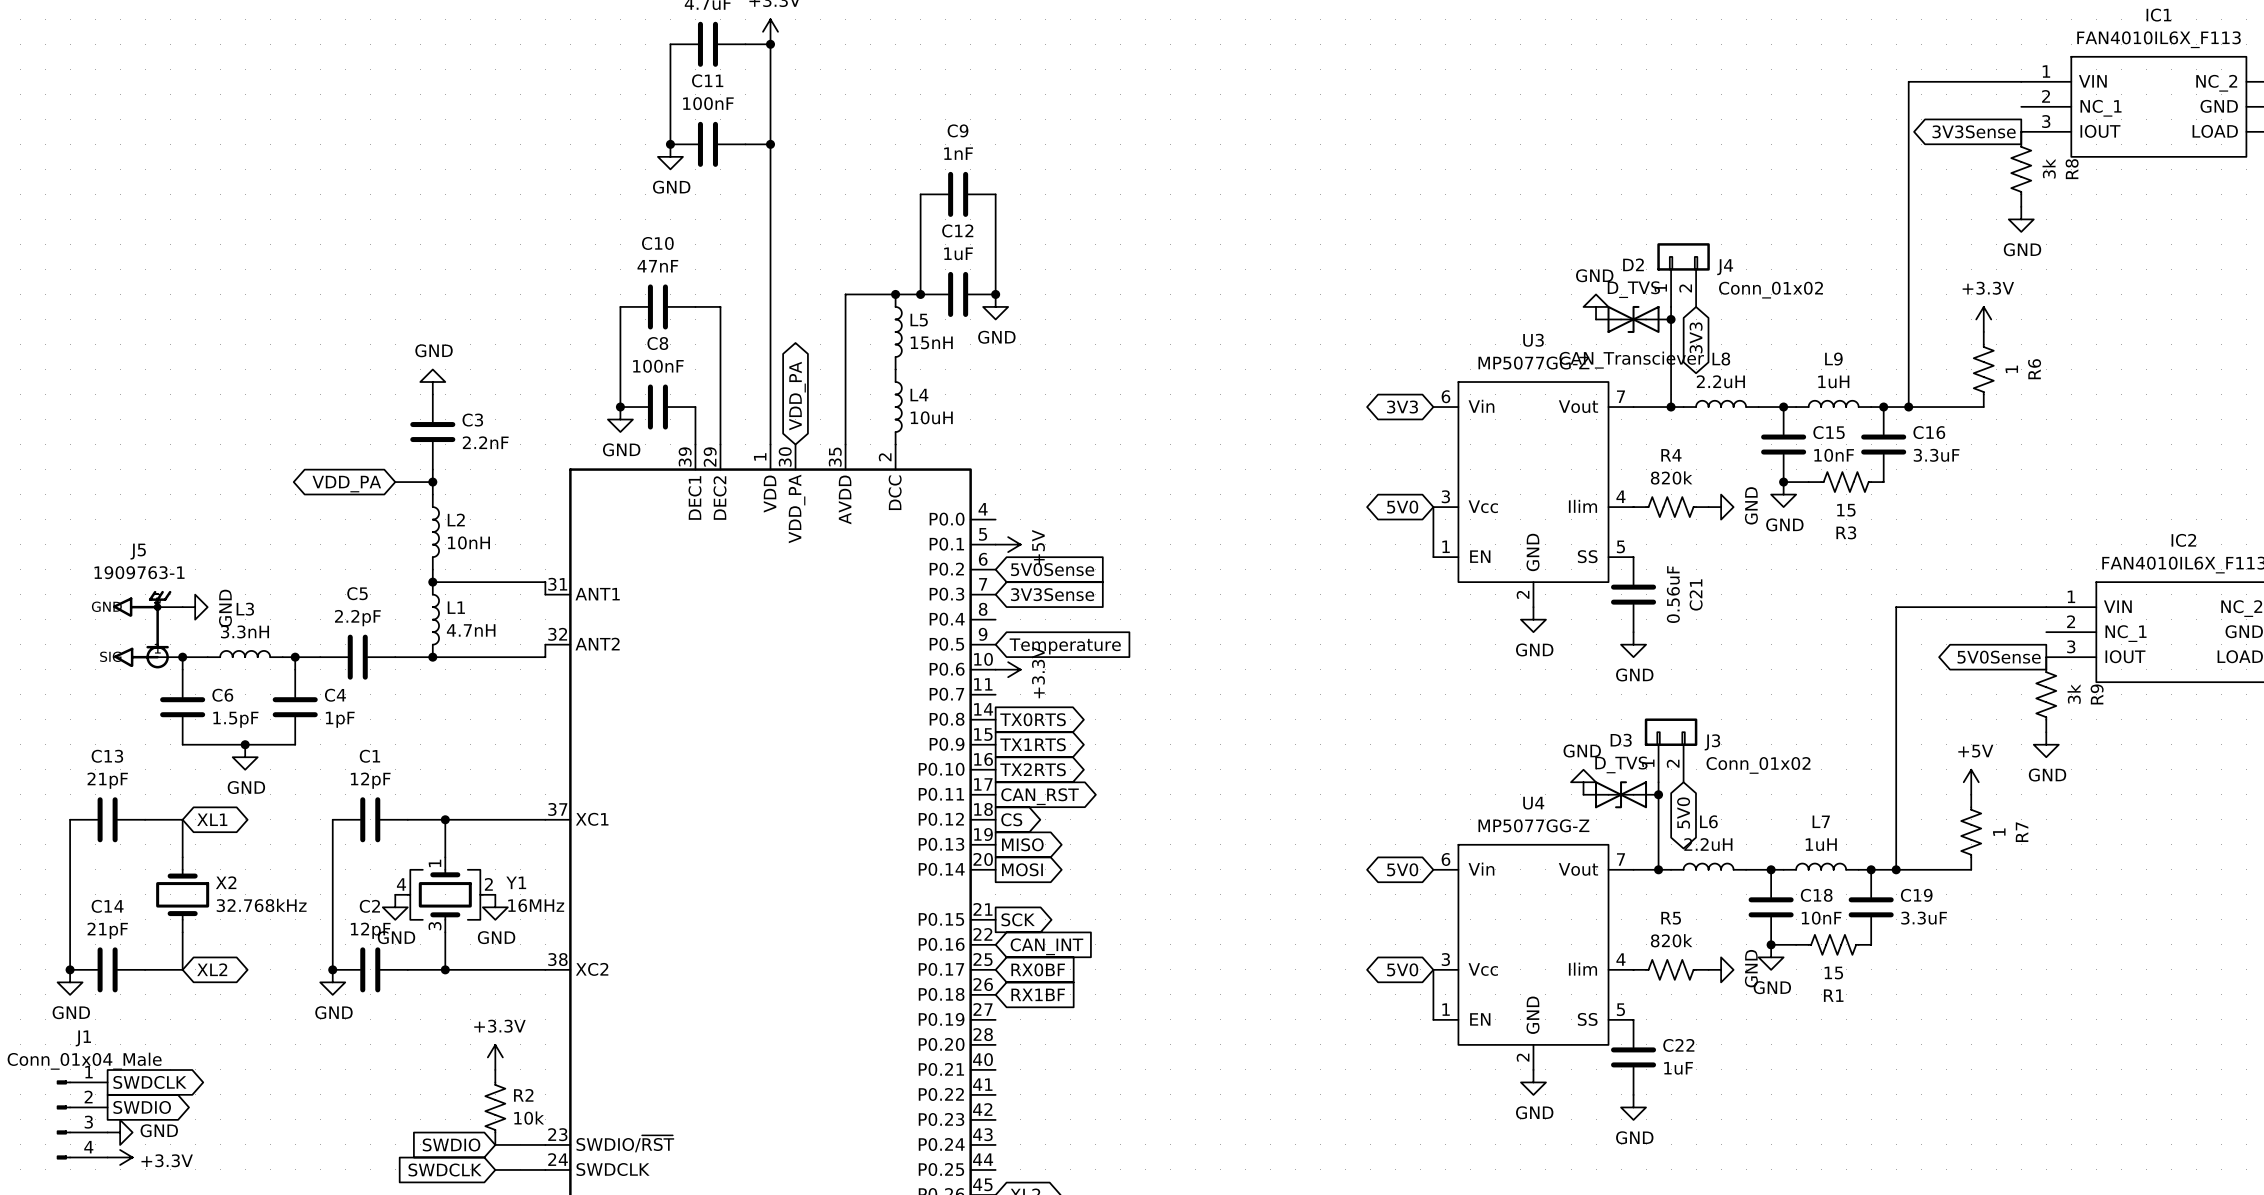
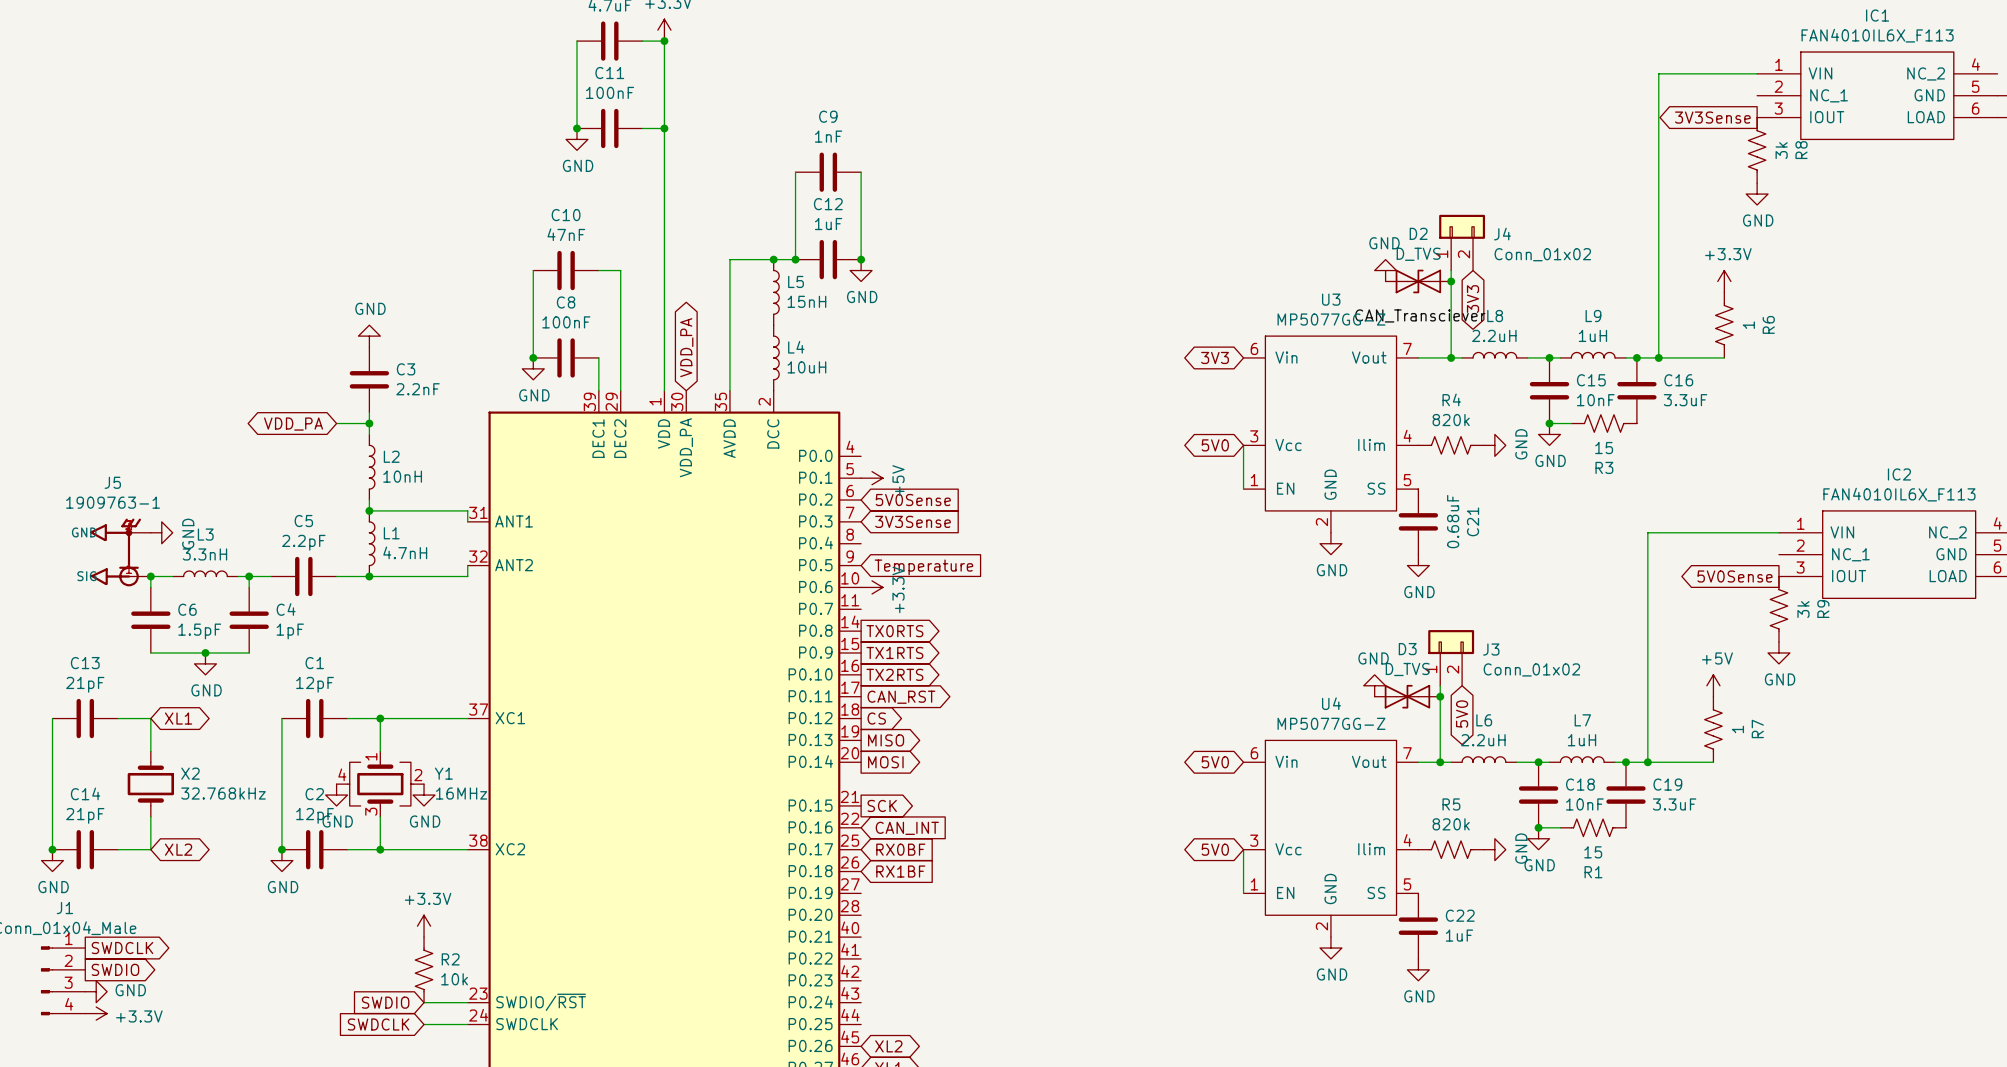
C21 value: 0.56uF (1673, 594) -> 0.68uF (1453, 521)

